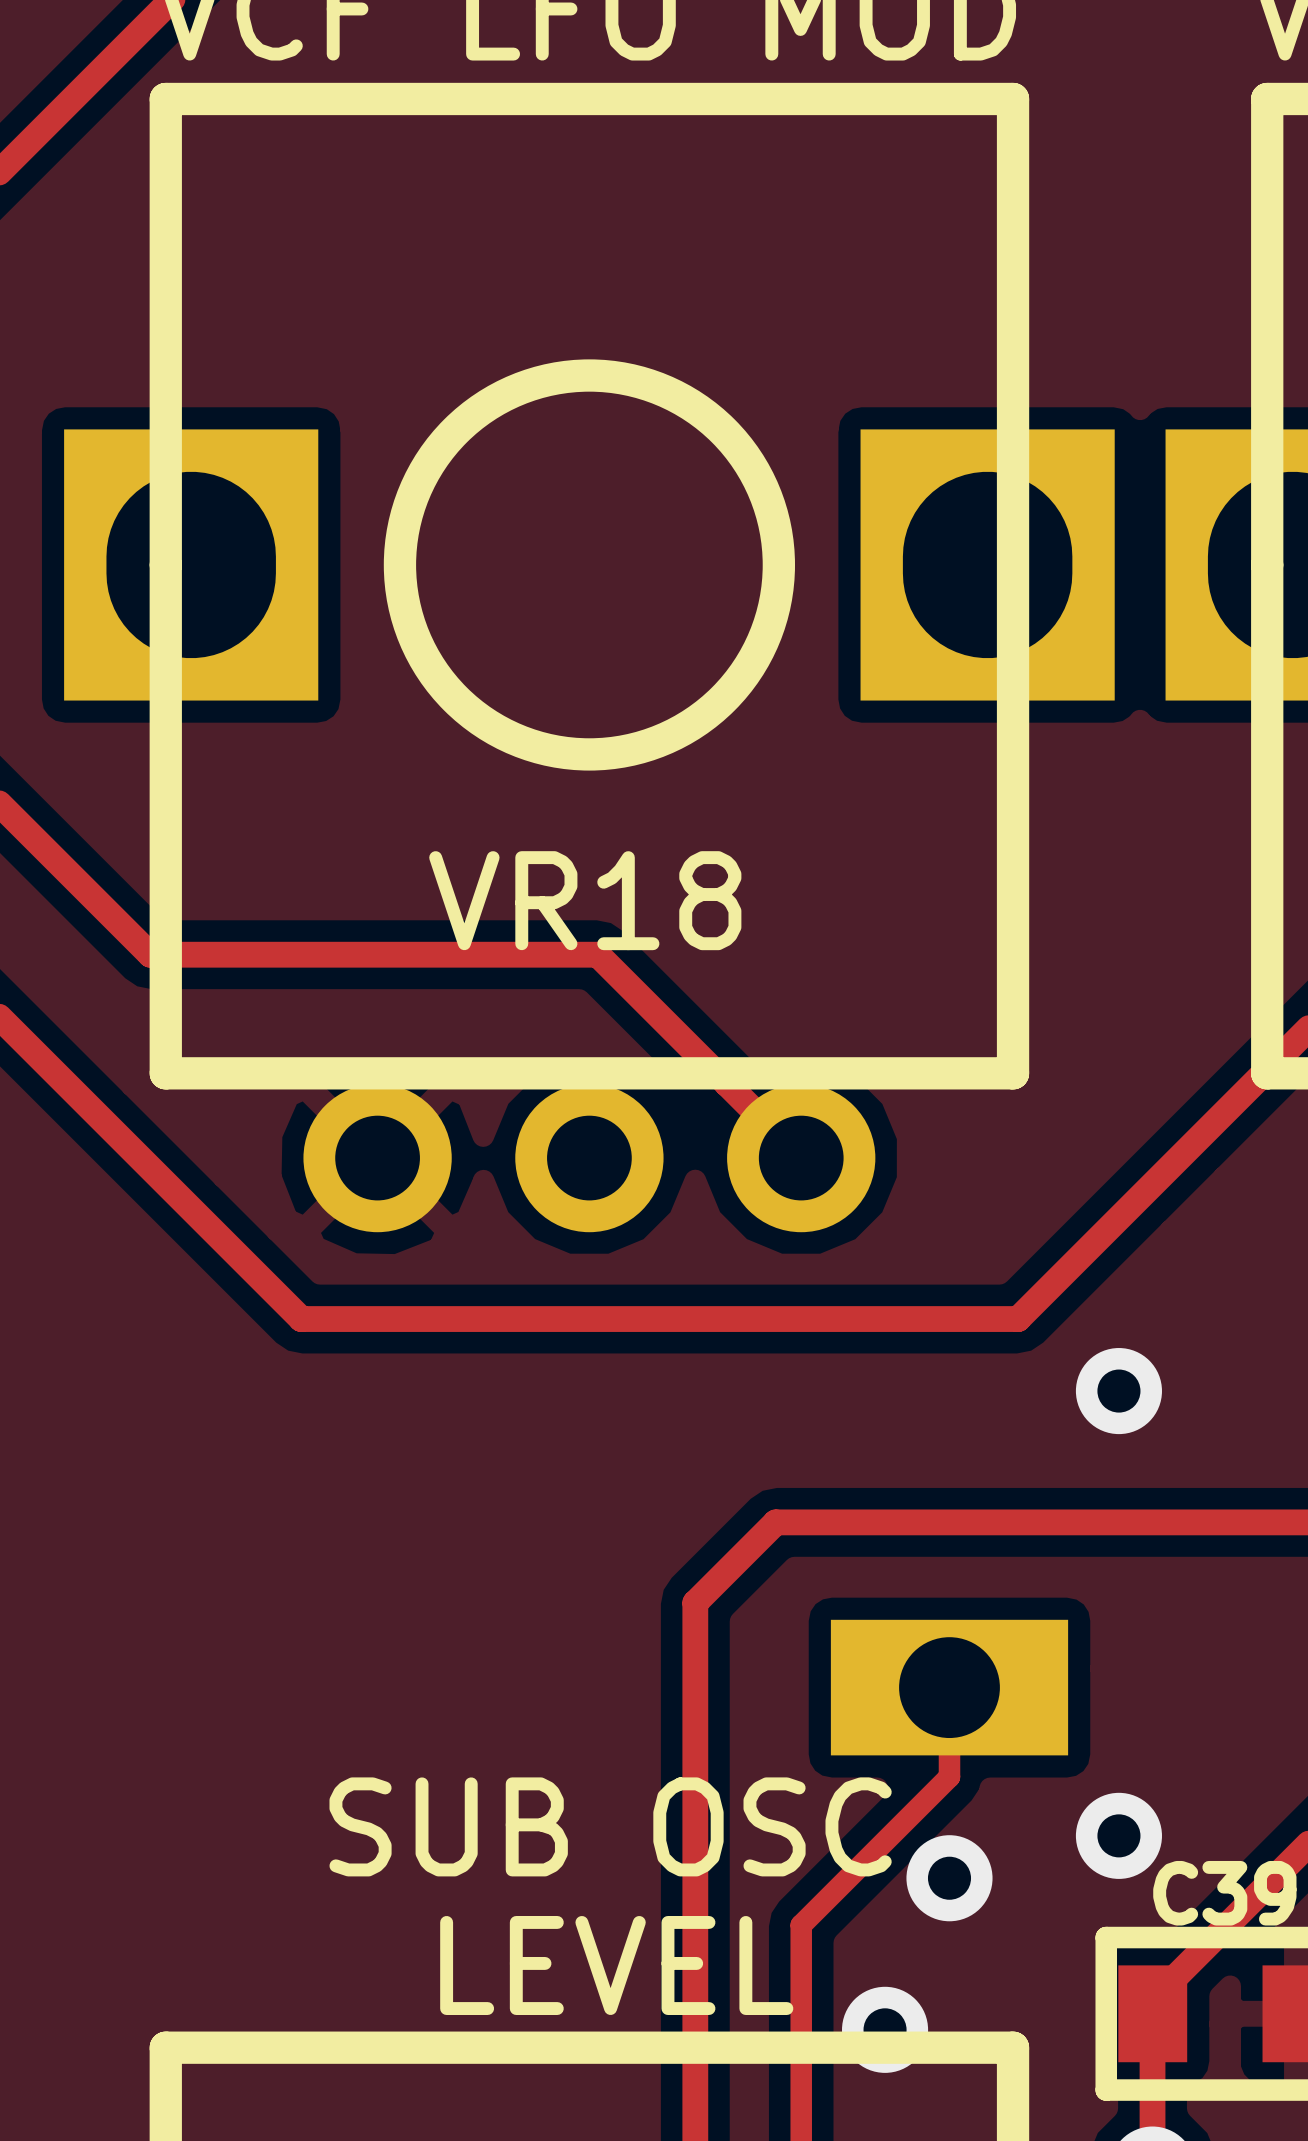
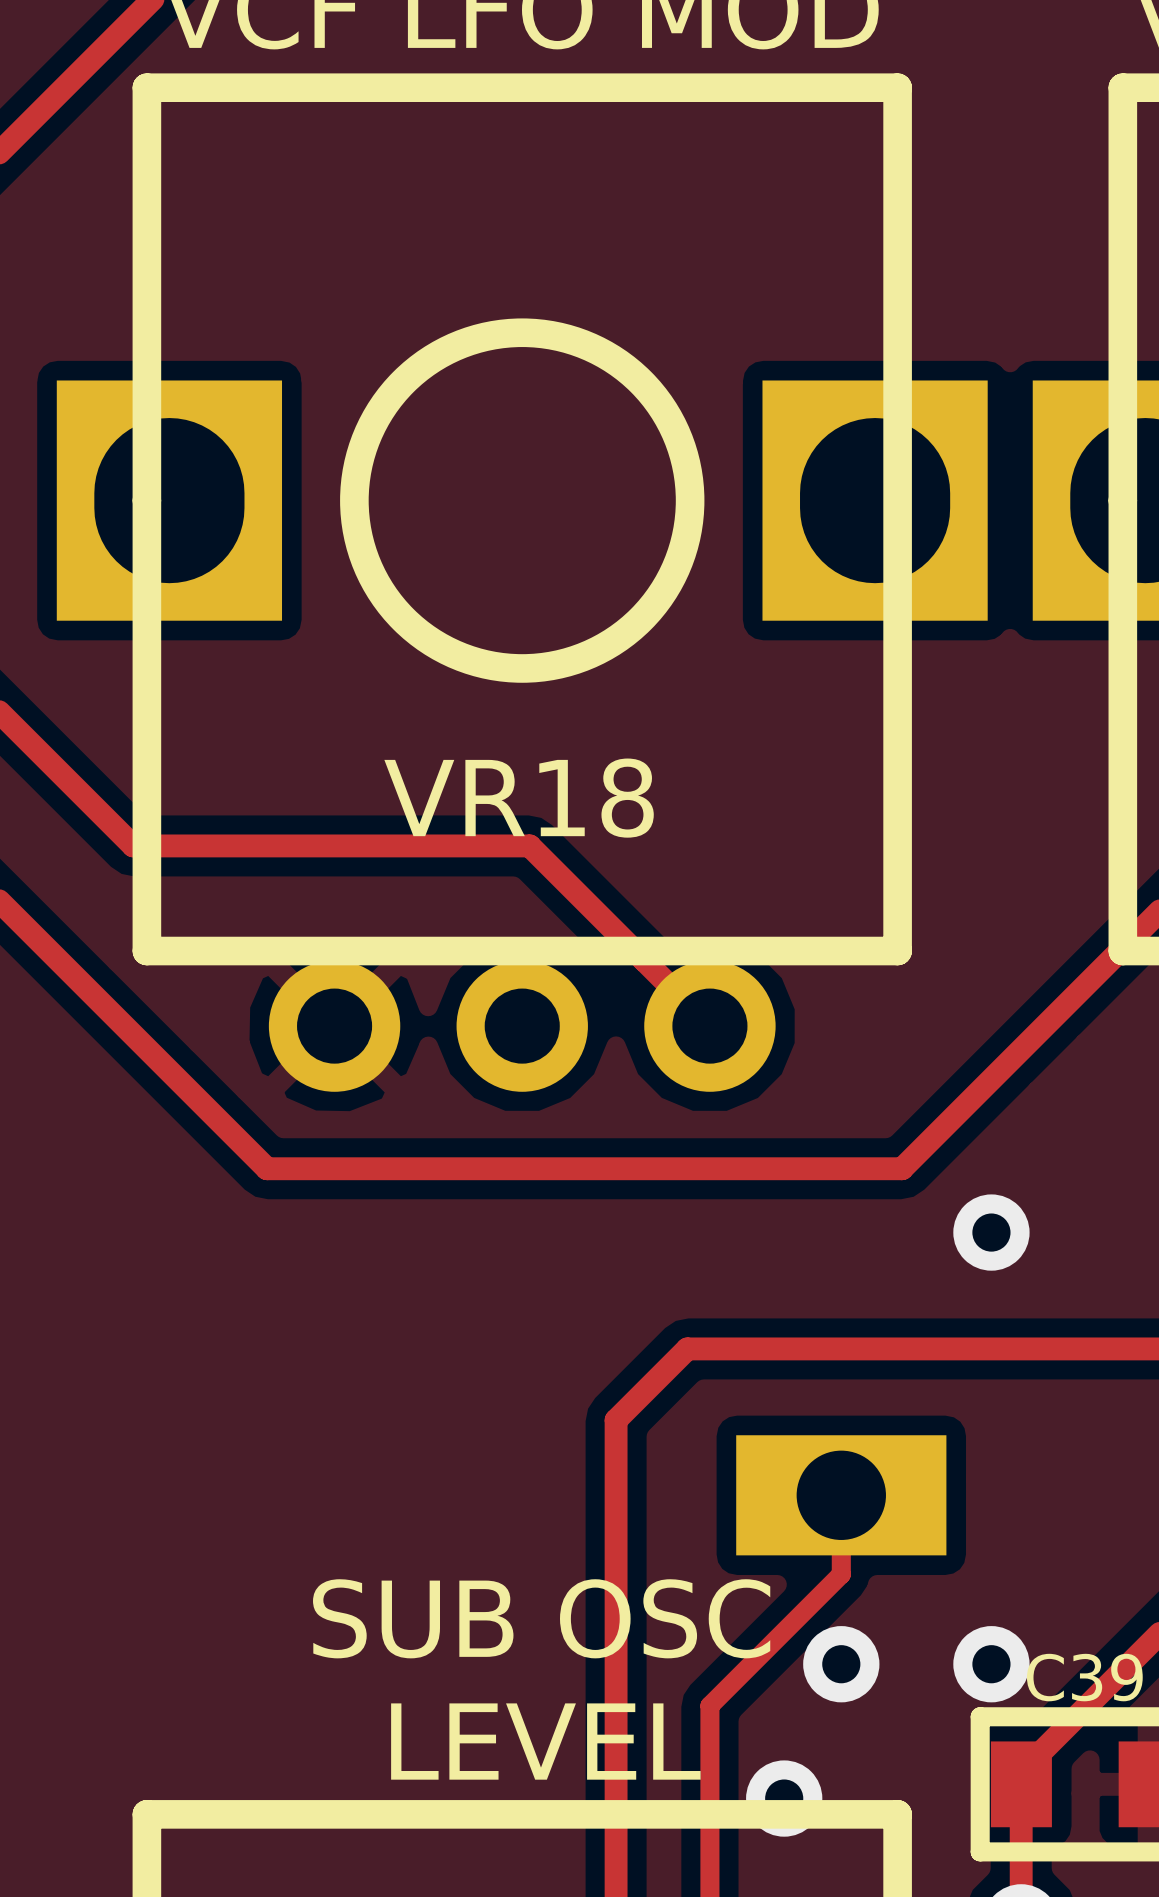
via position: (1118, 1835) -> (991, 1664)

